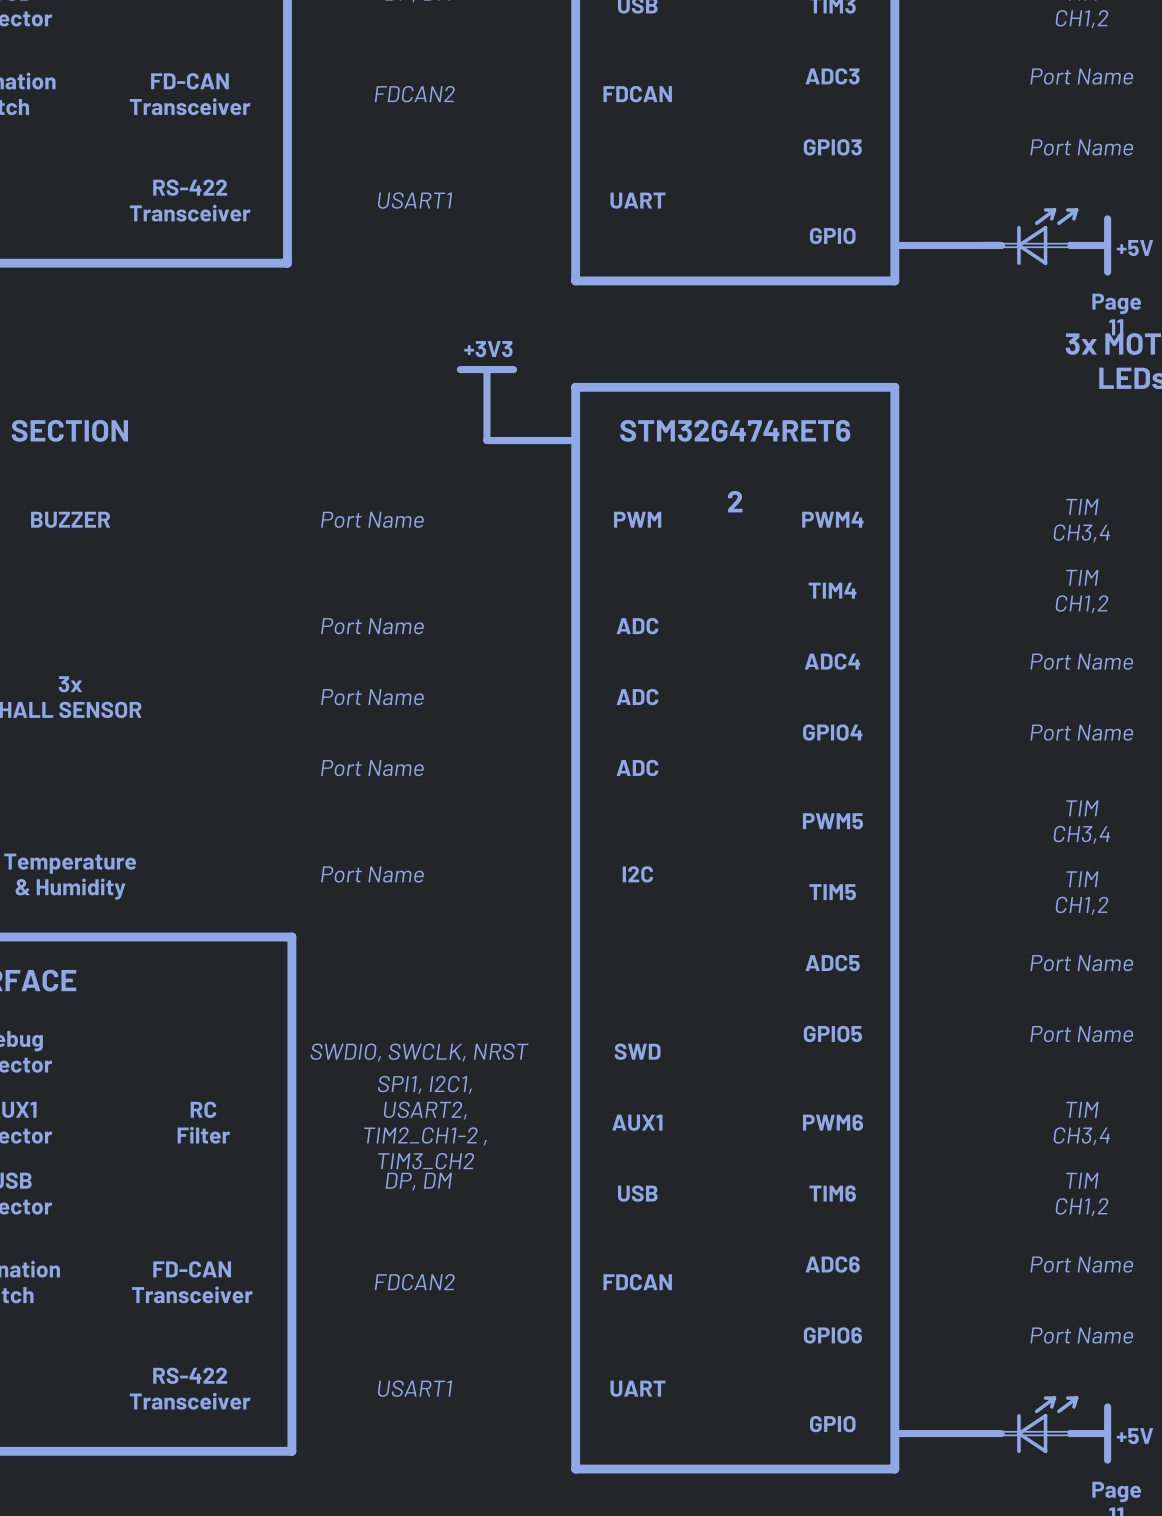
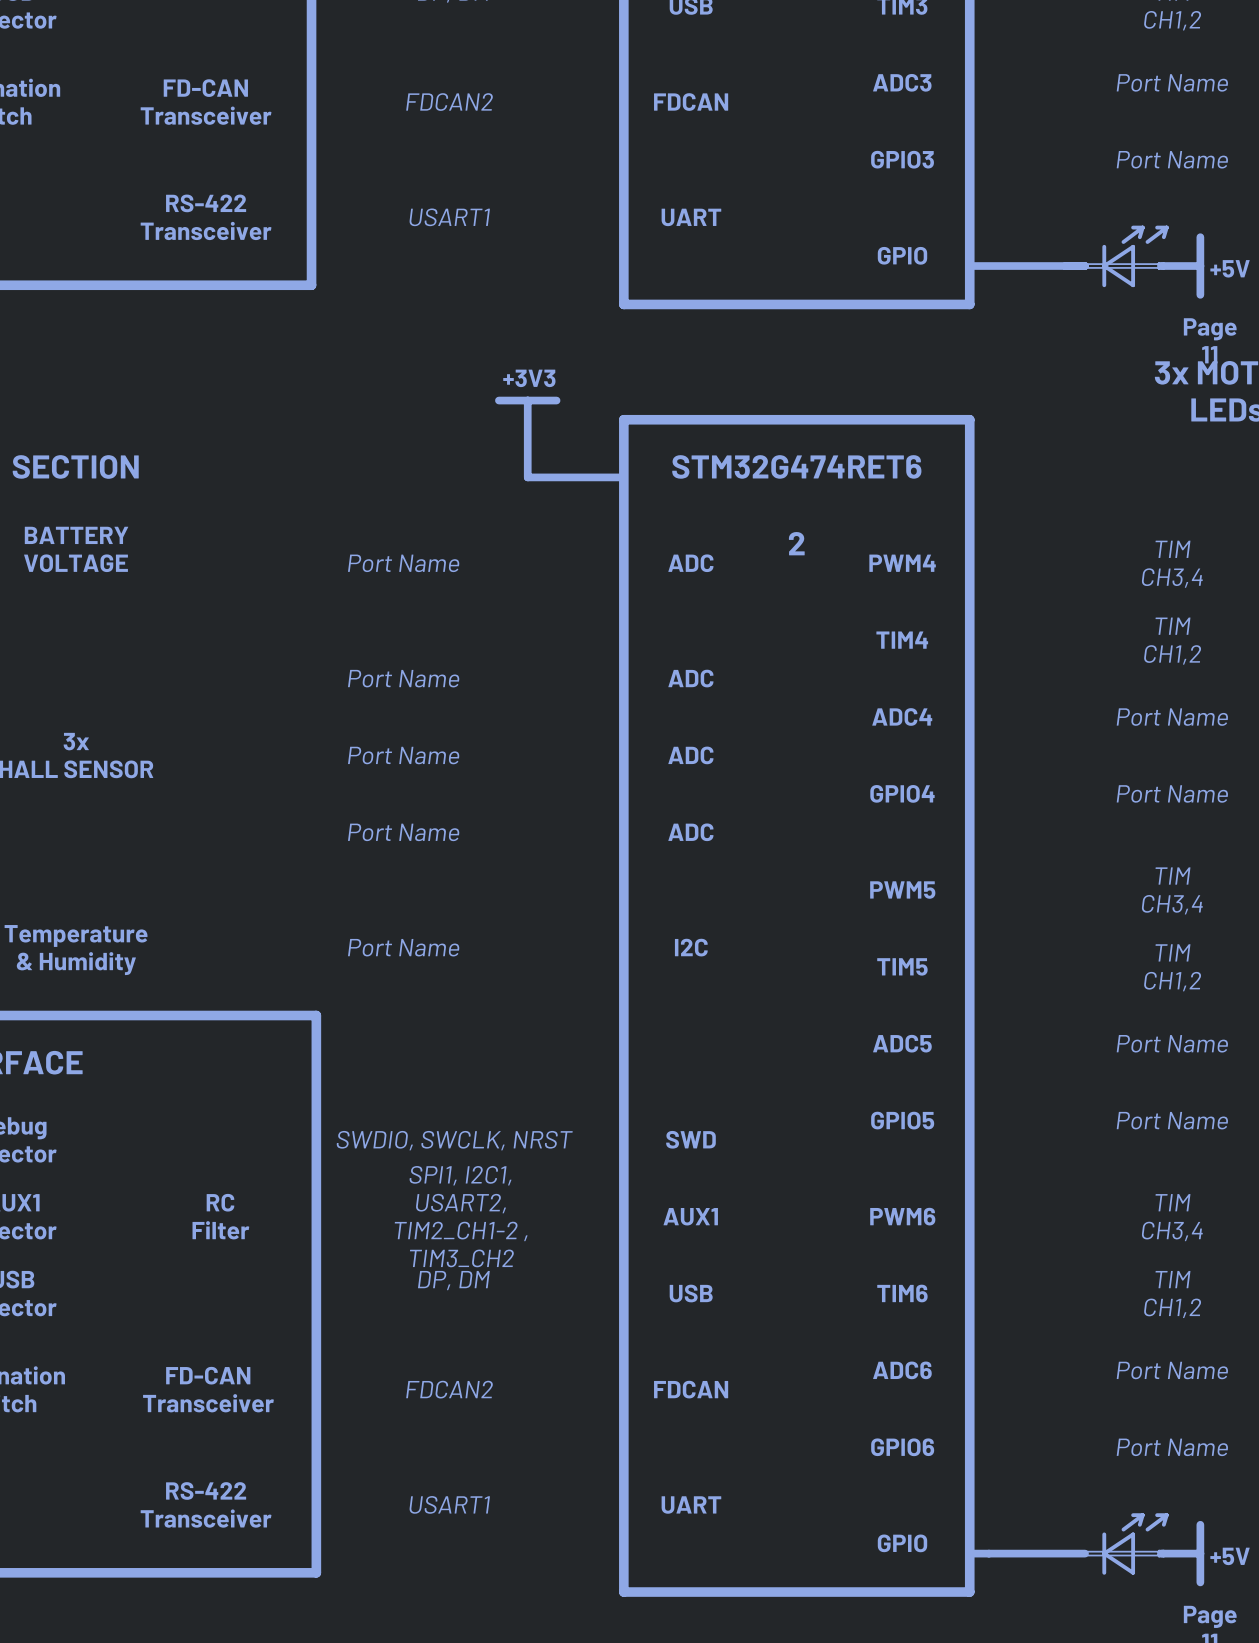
text: none -> BATTERY (76, 535)
text: BUZZER (70, 519) -> VOLTAGE (76, 563)
text: PWM (637, 519) -> ADC (690, 563)

